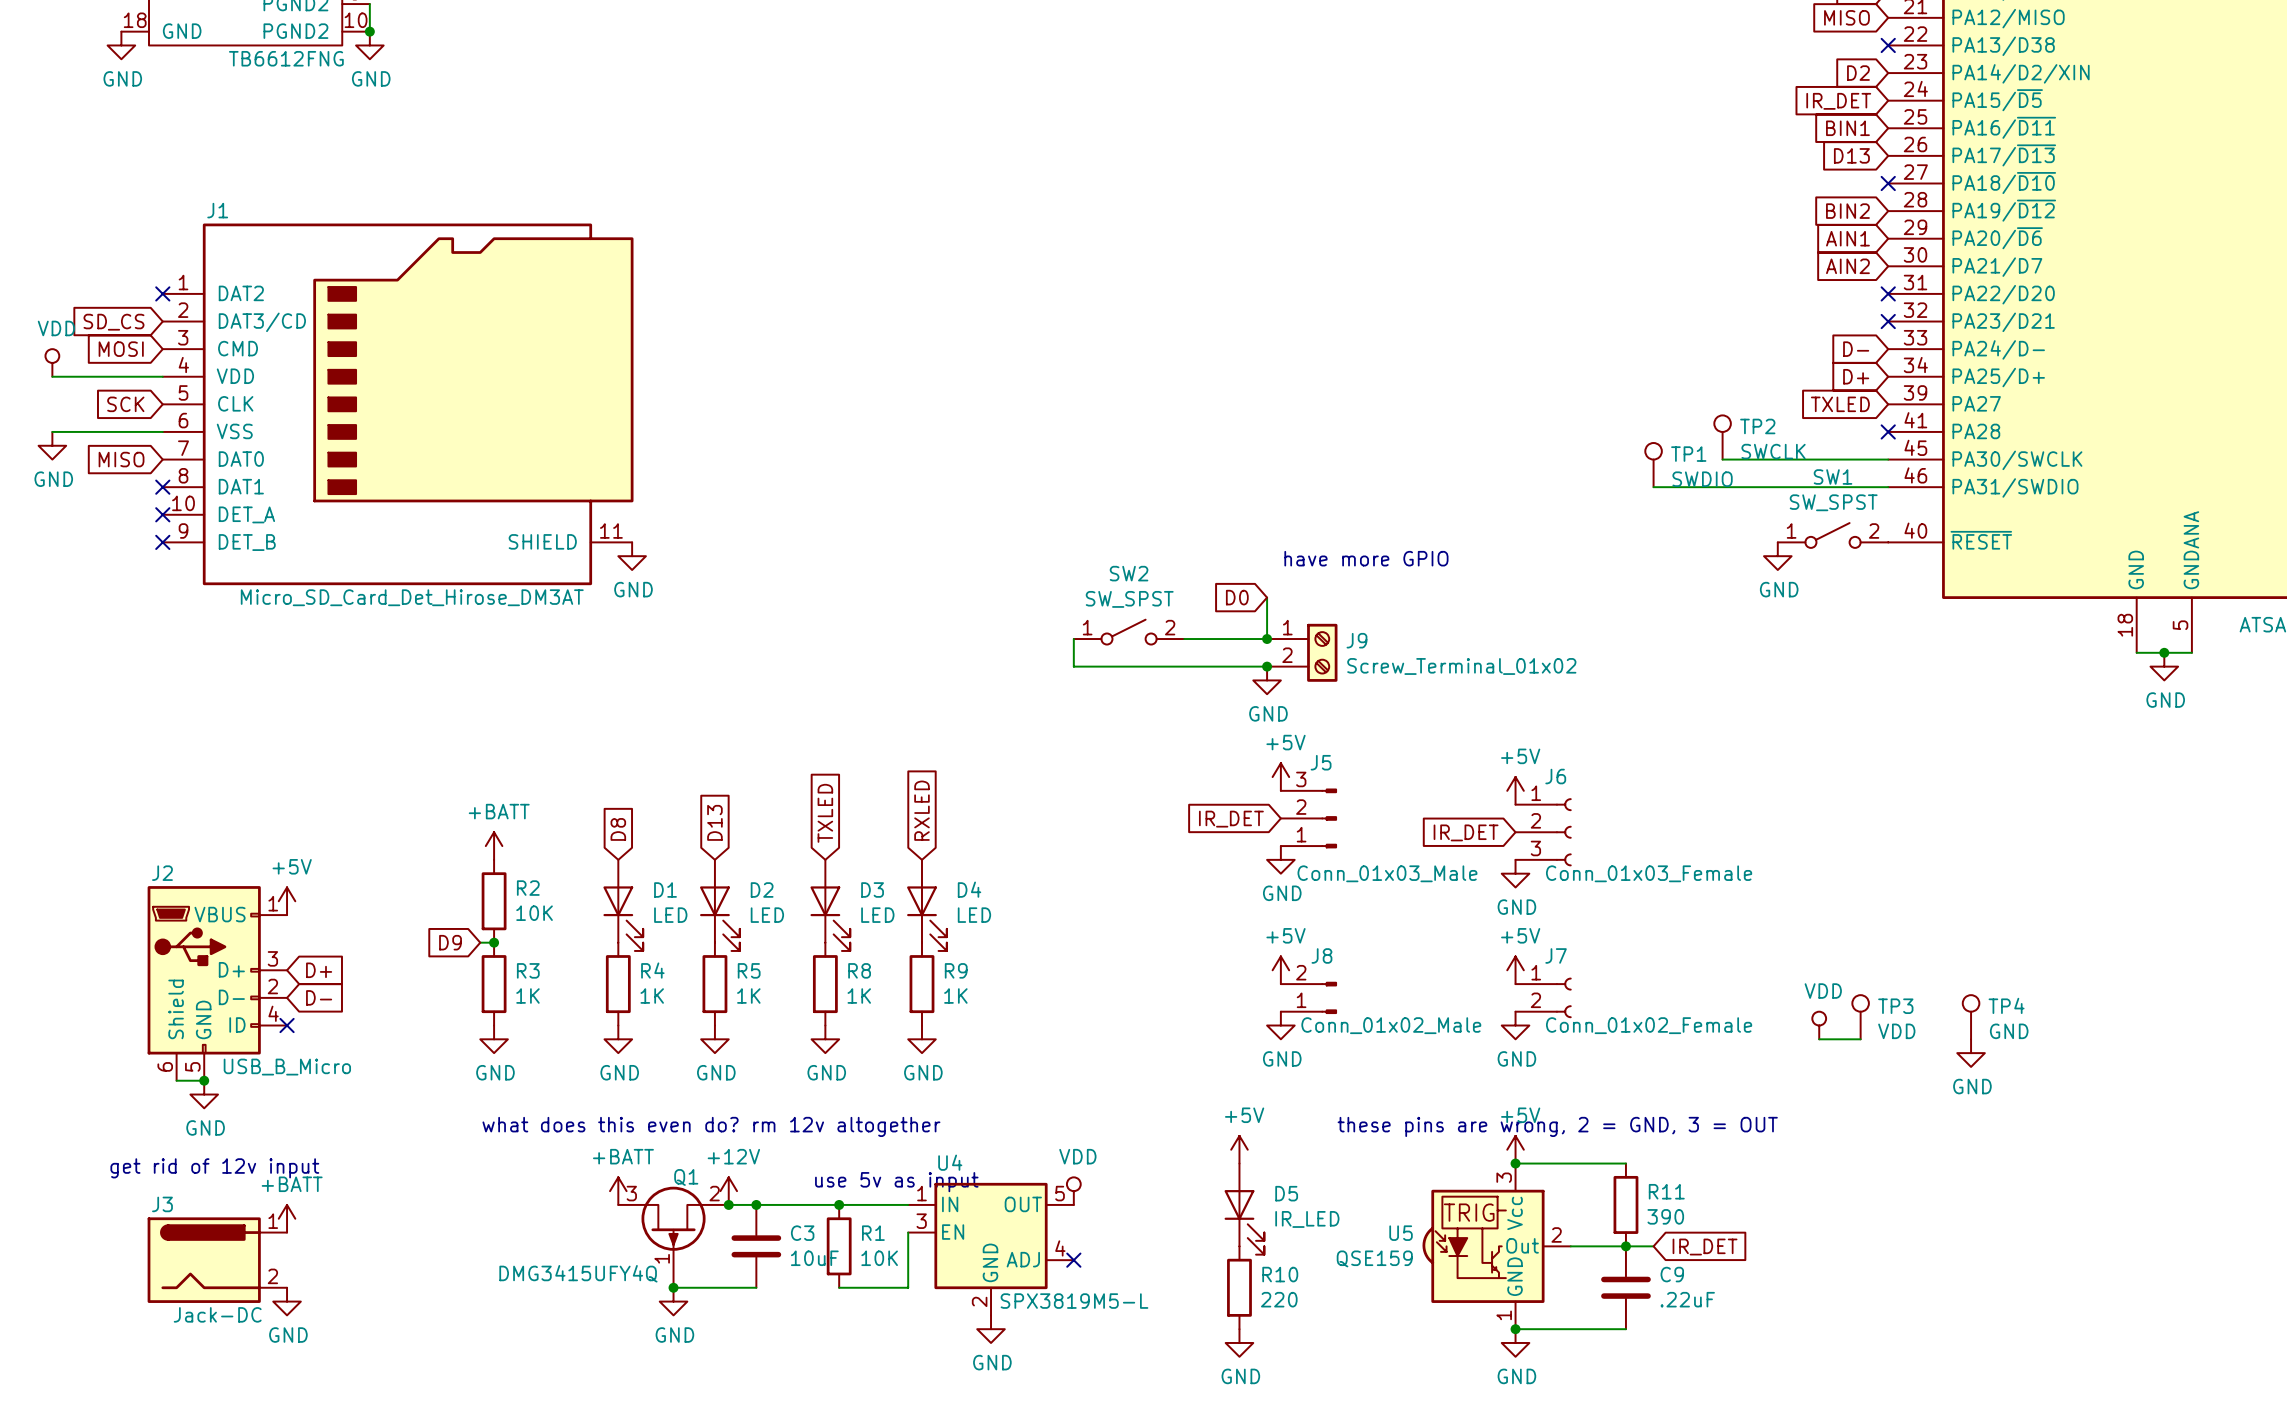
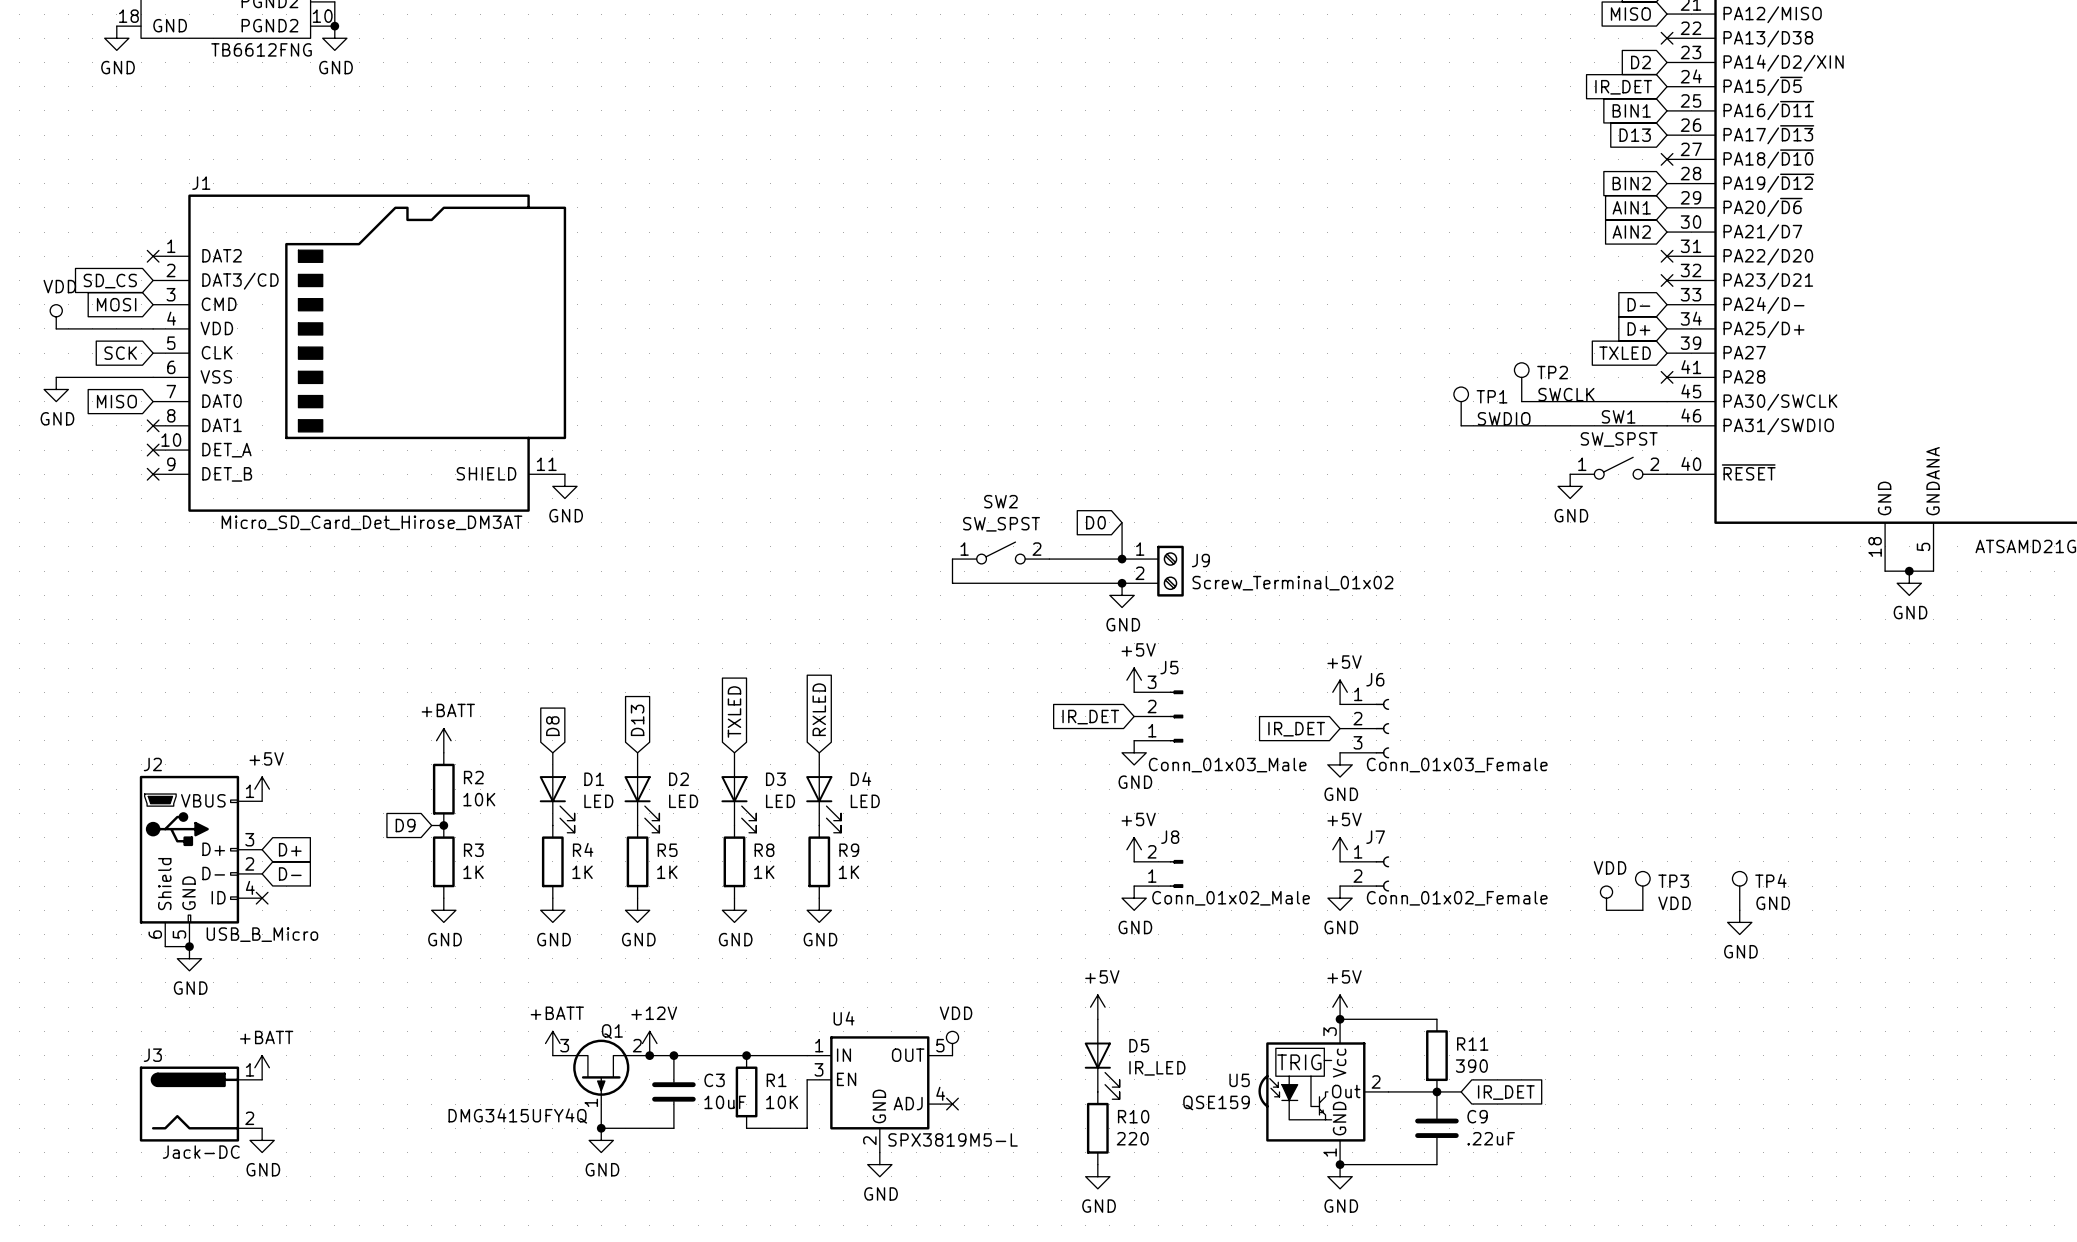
text: have more GPIO (1366, 558) -> none
text: what does this even do? rm 12v altogether (711, 1126) -> none
text: these pins are wrong, 2 = GND, 3 = OUT (1557, 1126) -> none
text: get rid of 12v input (214, 1168) -> none
text: use 5v as input (896, 1182) -> none

